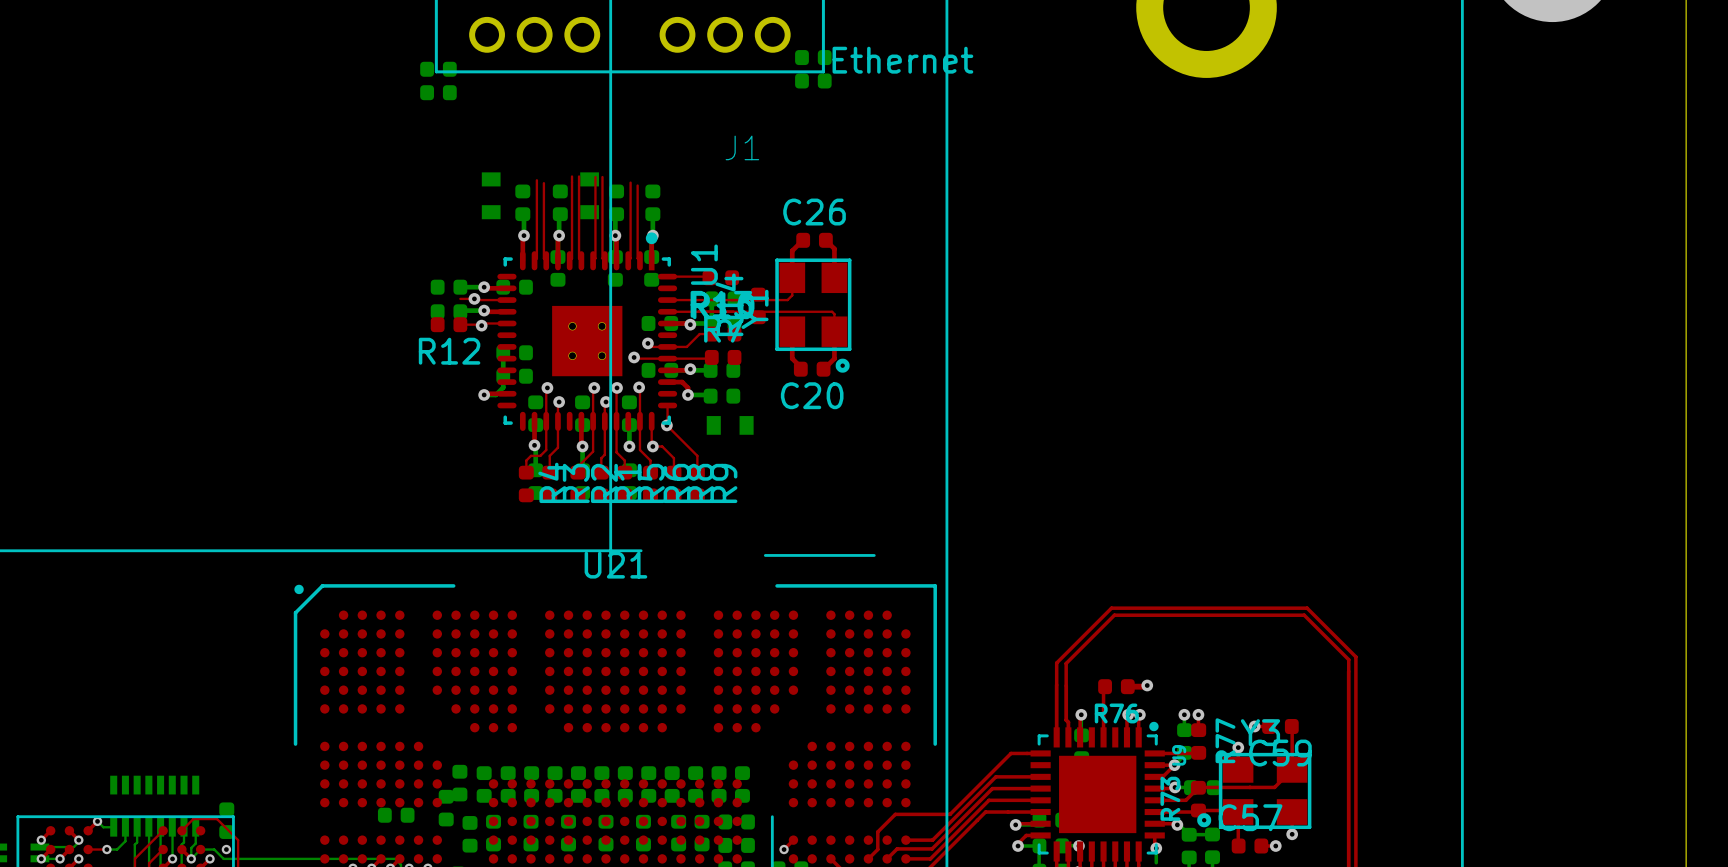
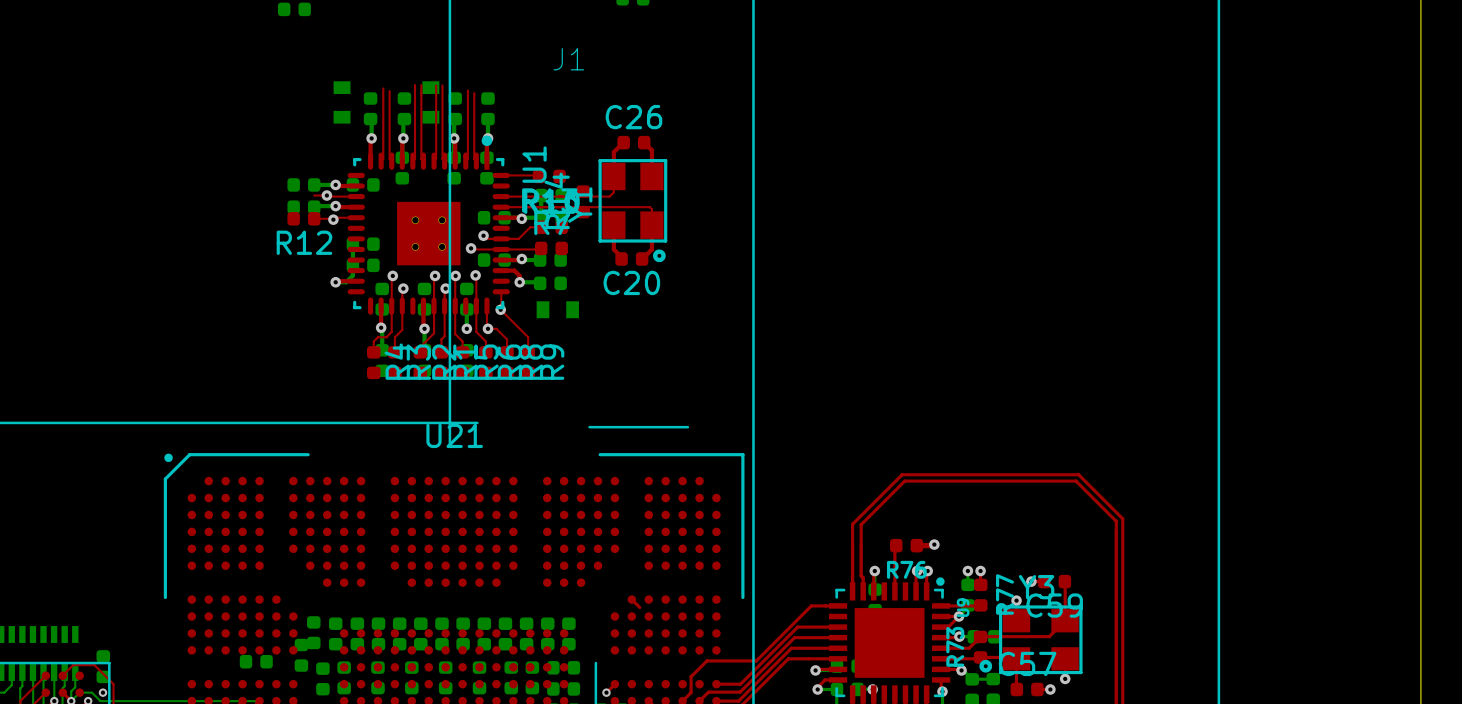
top track: none -> (631, 599) (639, 607)

